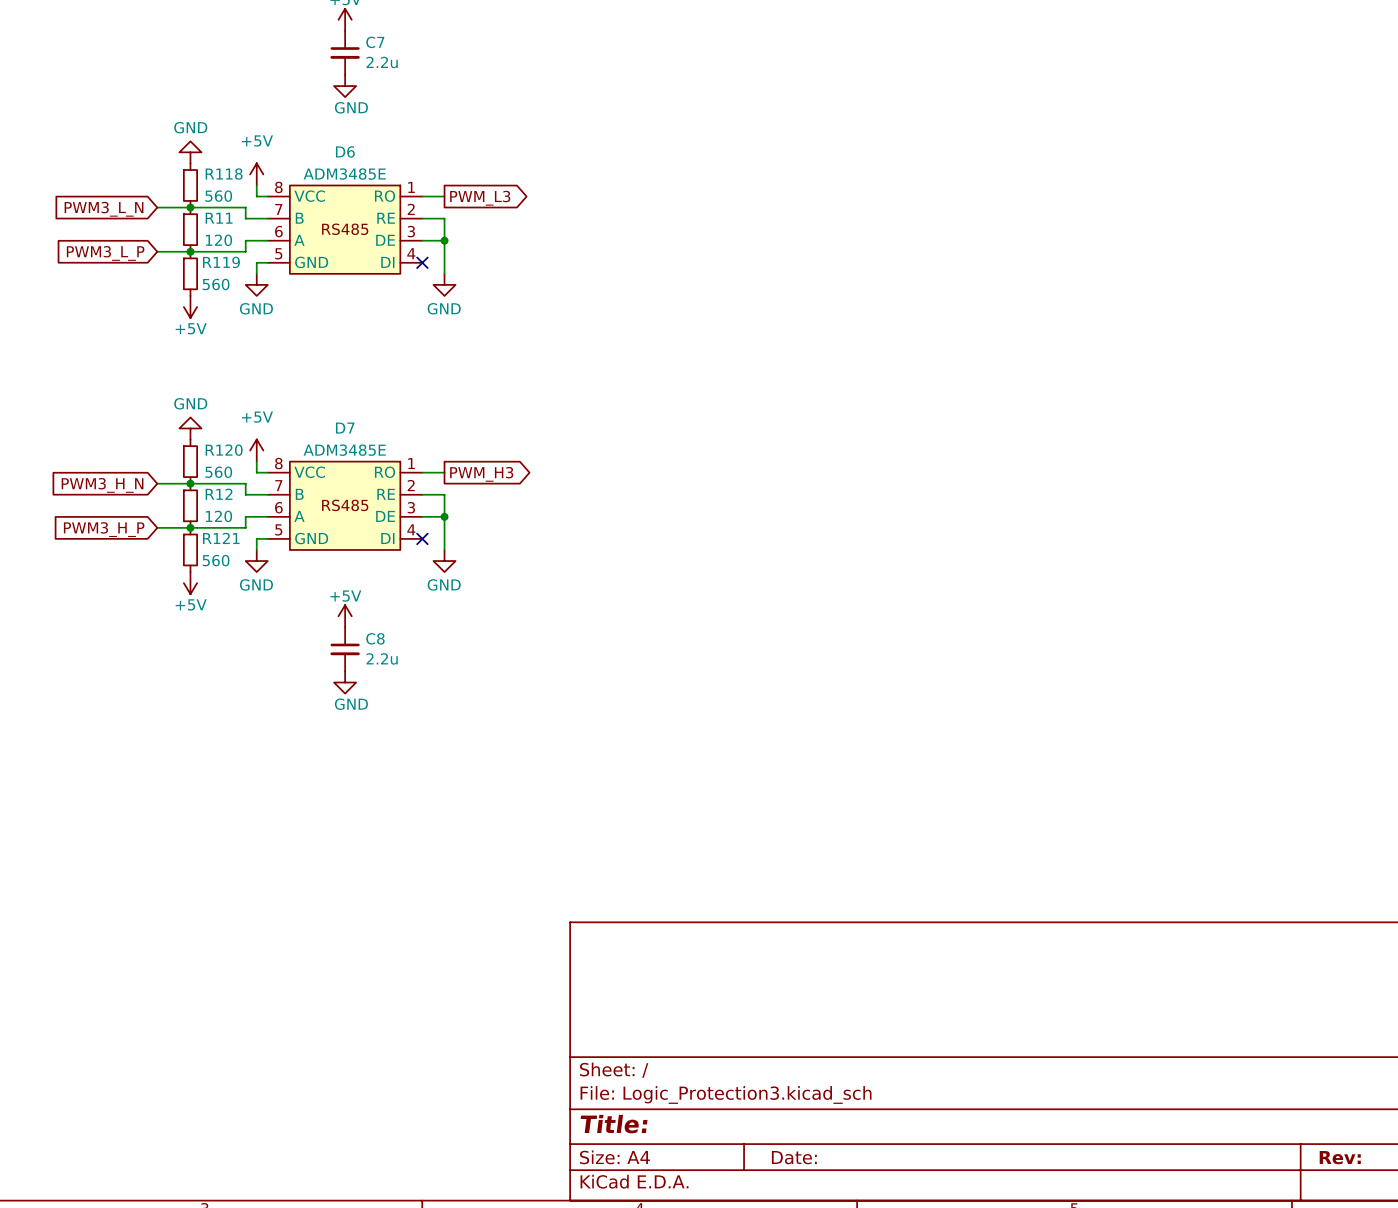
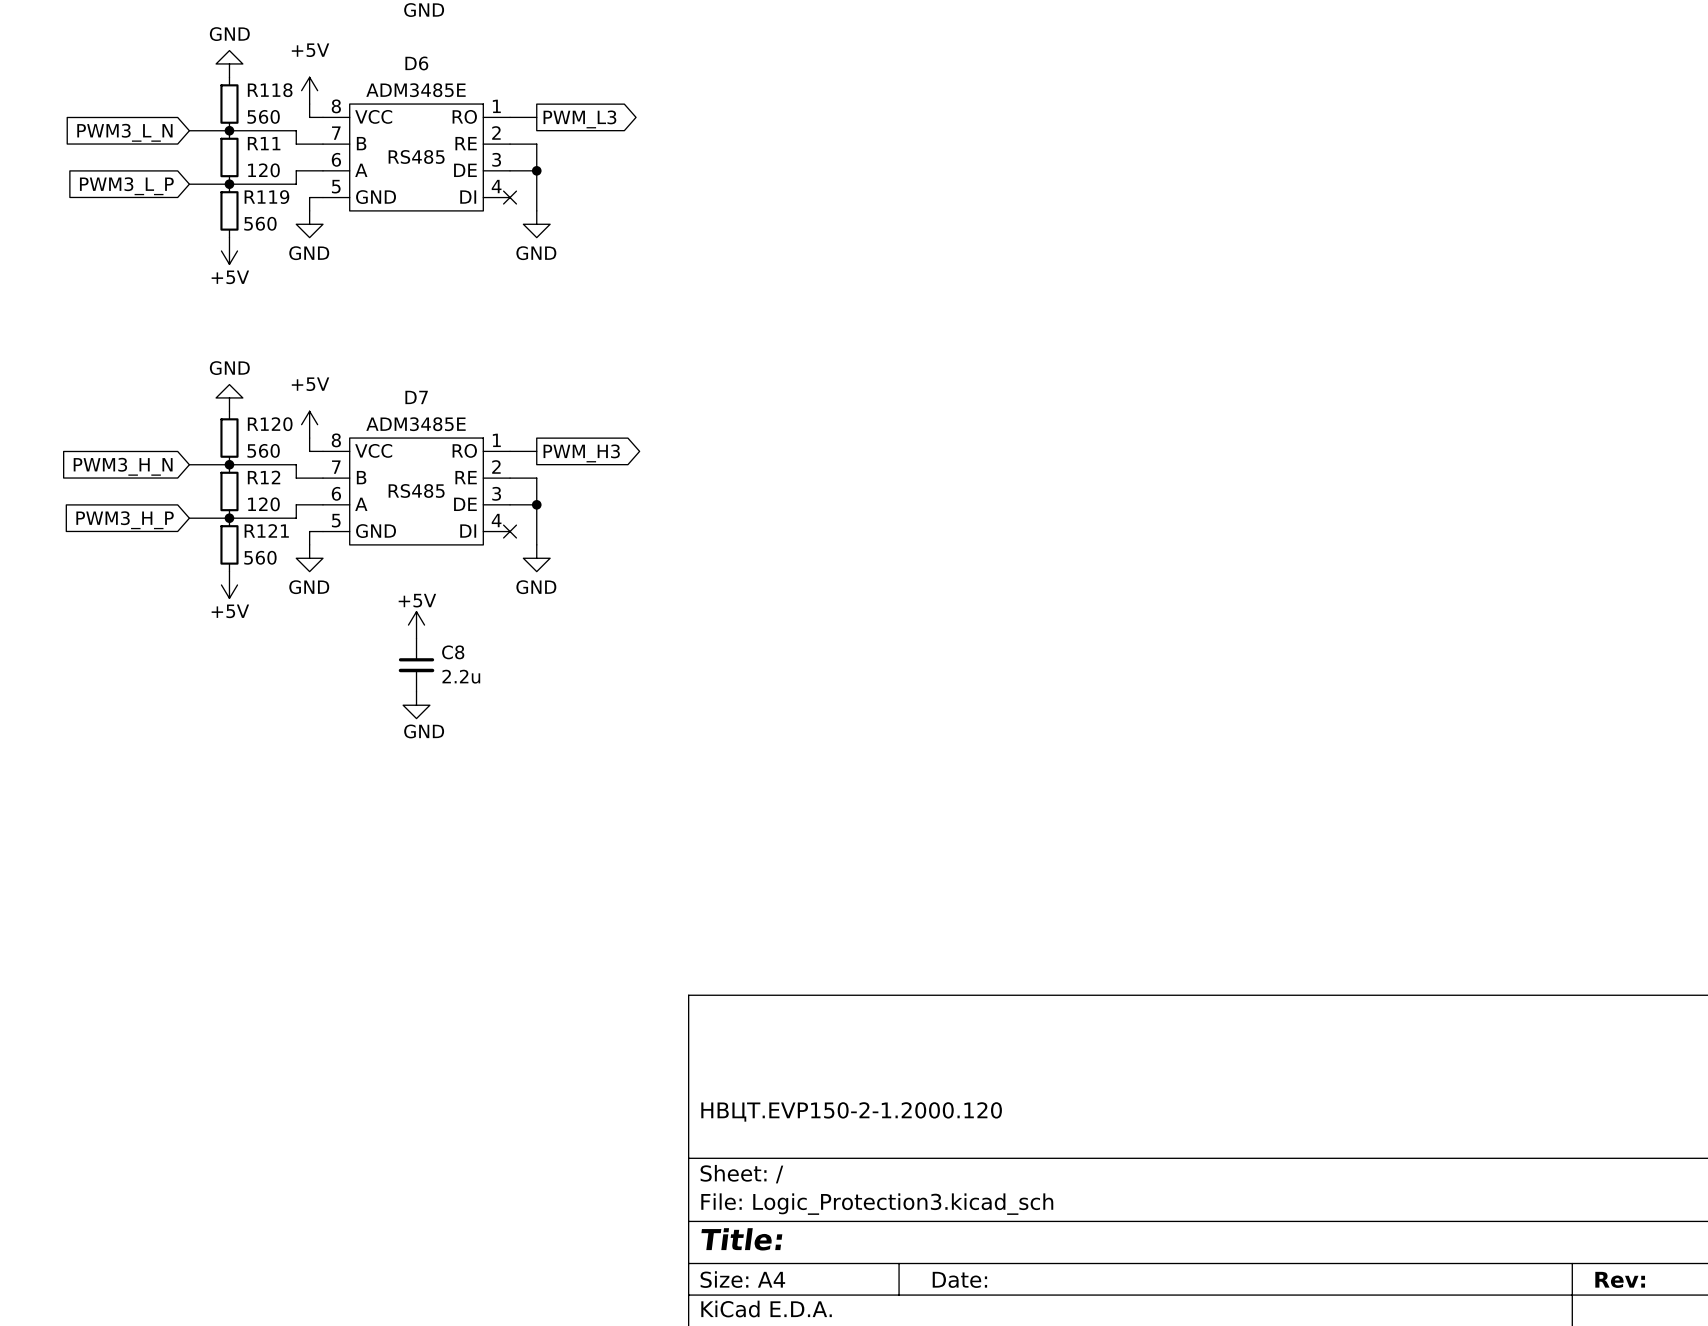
title block: none -> НВЦТ.EVP150-2-1.2000.120 (851, 1111)

